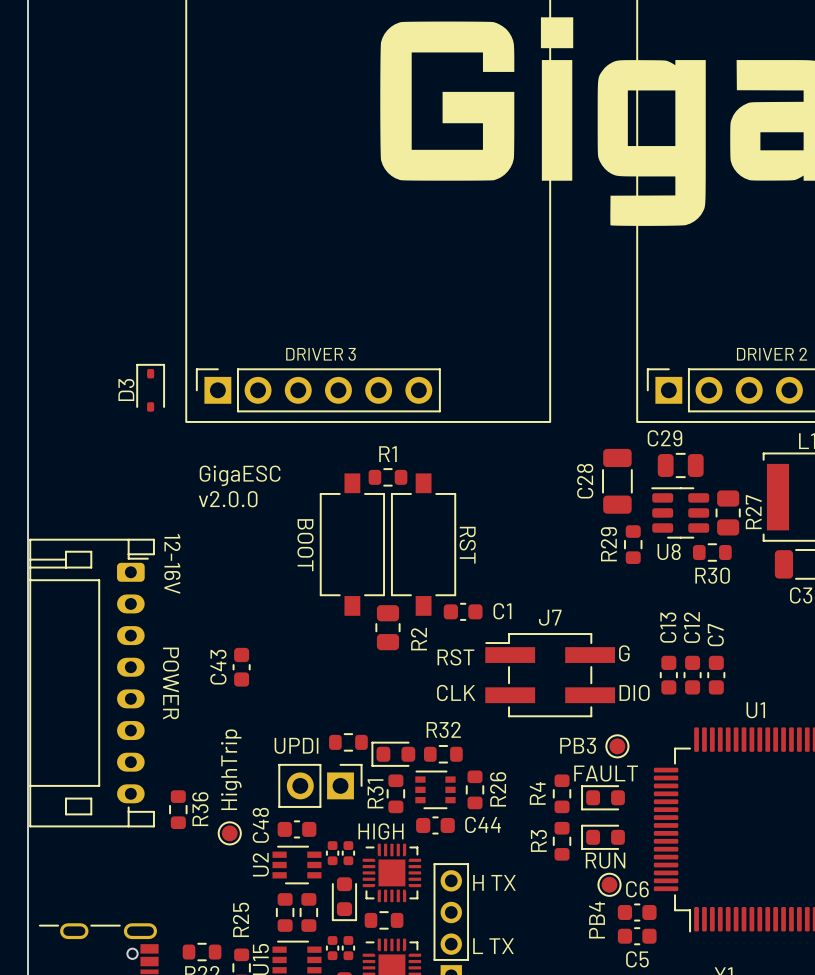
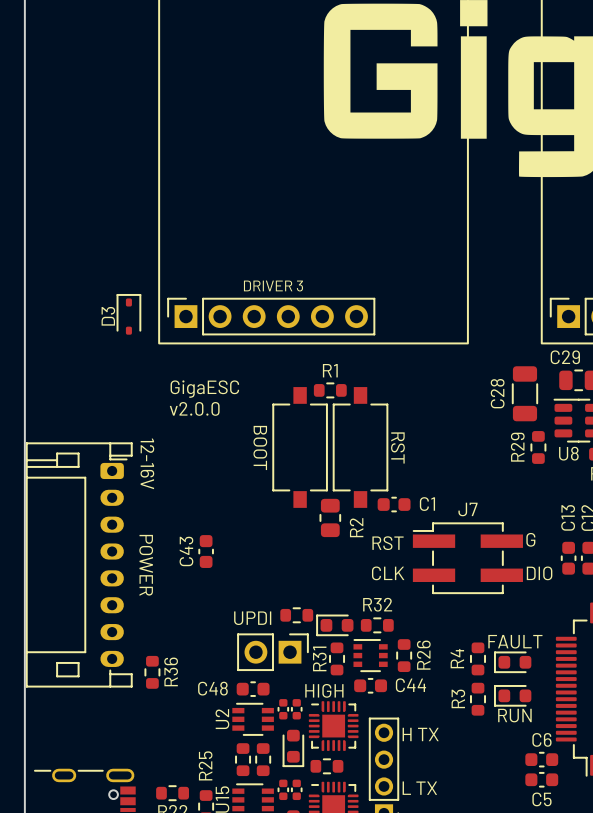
part: (617, 746) -> none
C48 name rotation: 0° (260, 825) -> 90° clockwise (212, 688)
part: HighTrip (229, 833) -> none
part: (609, 884) -> none

